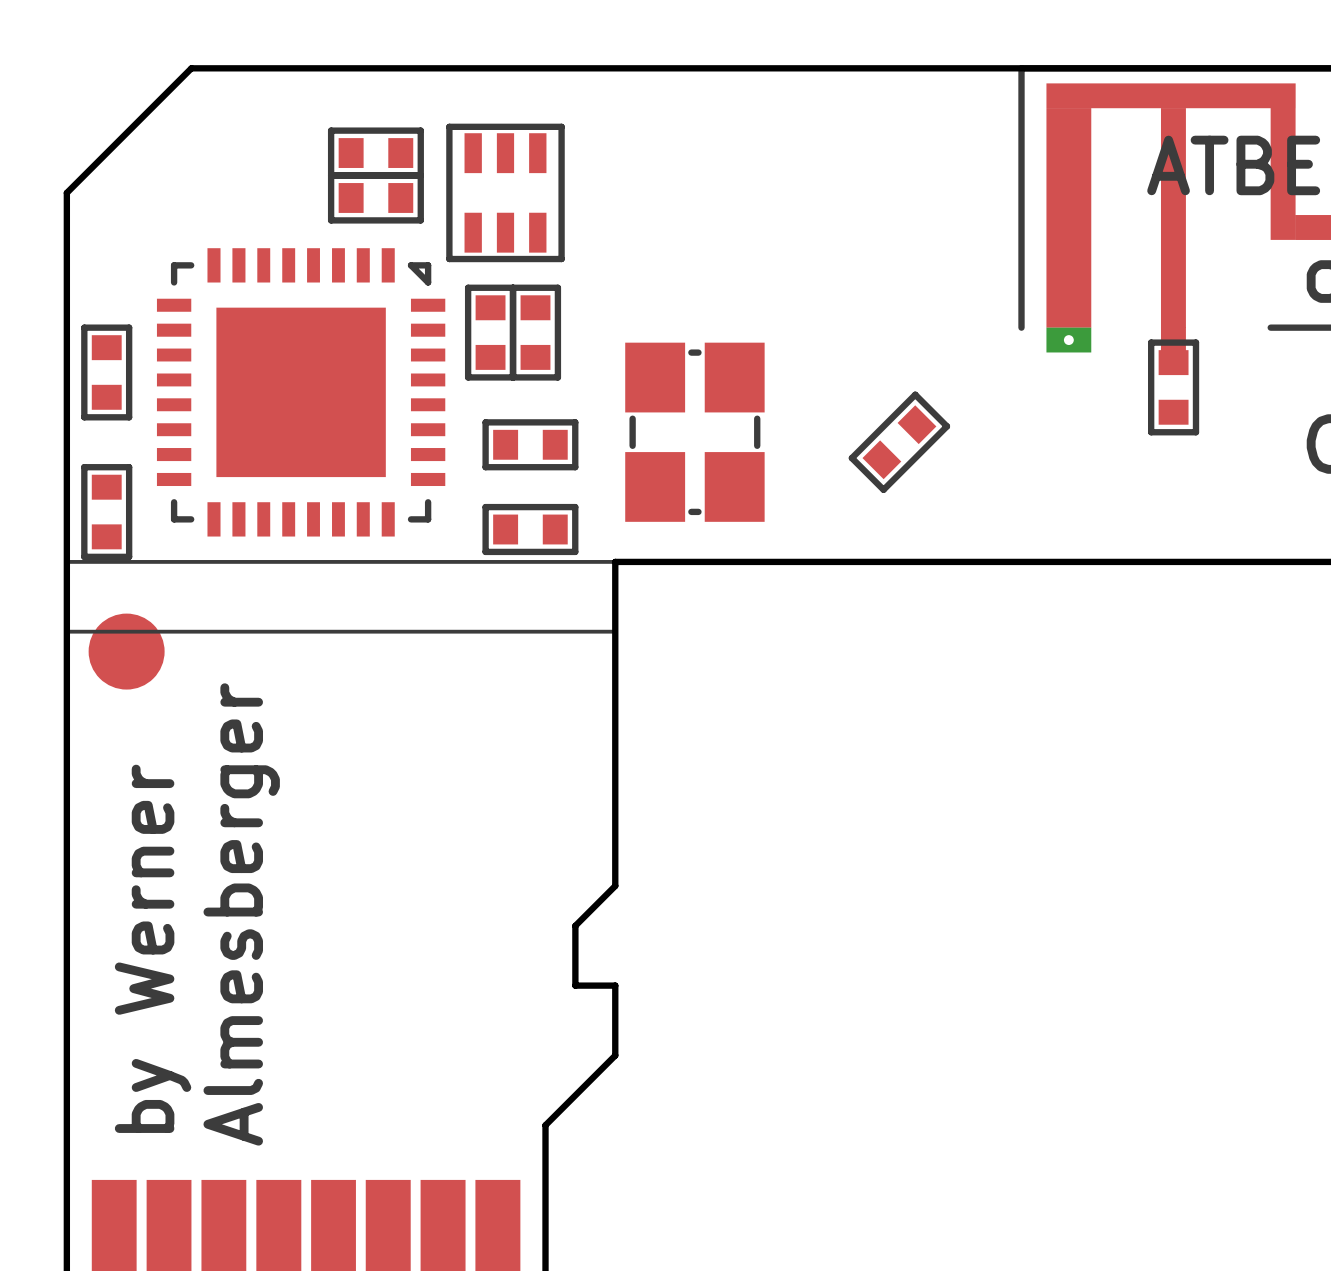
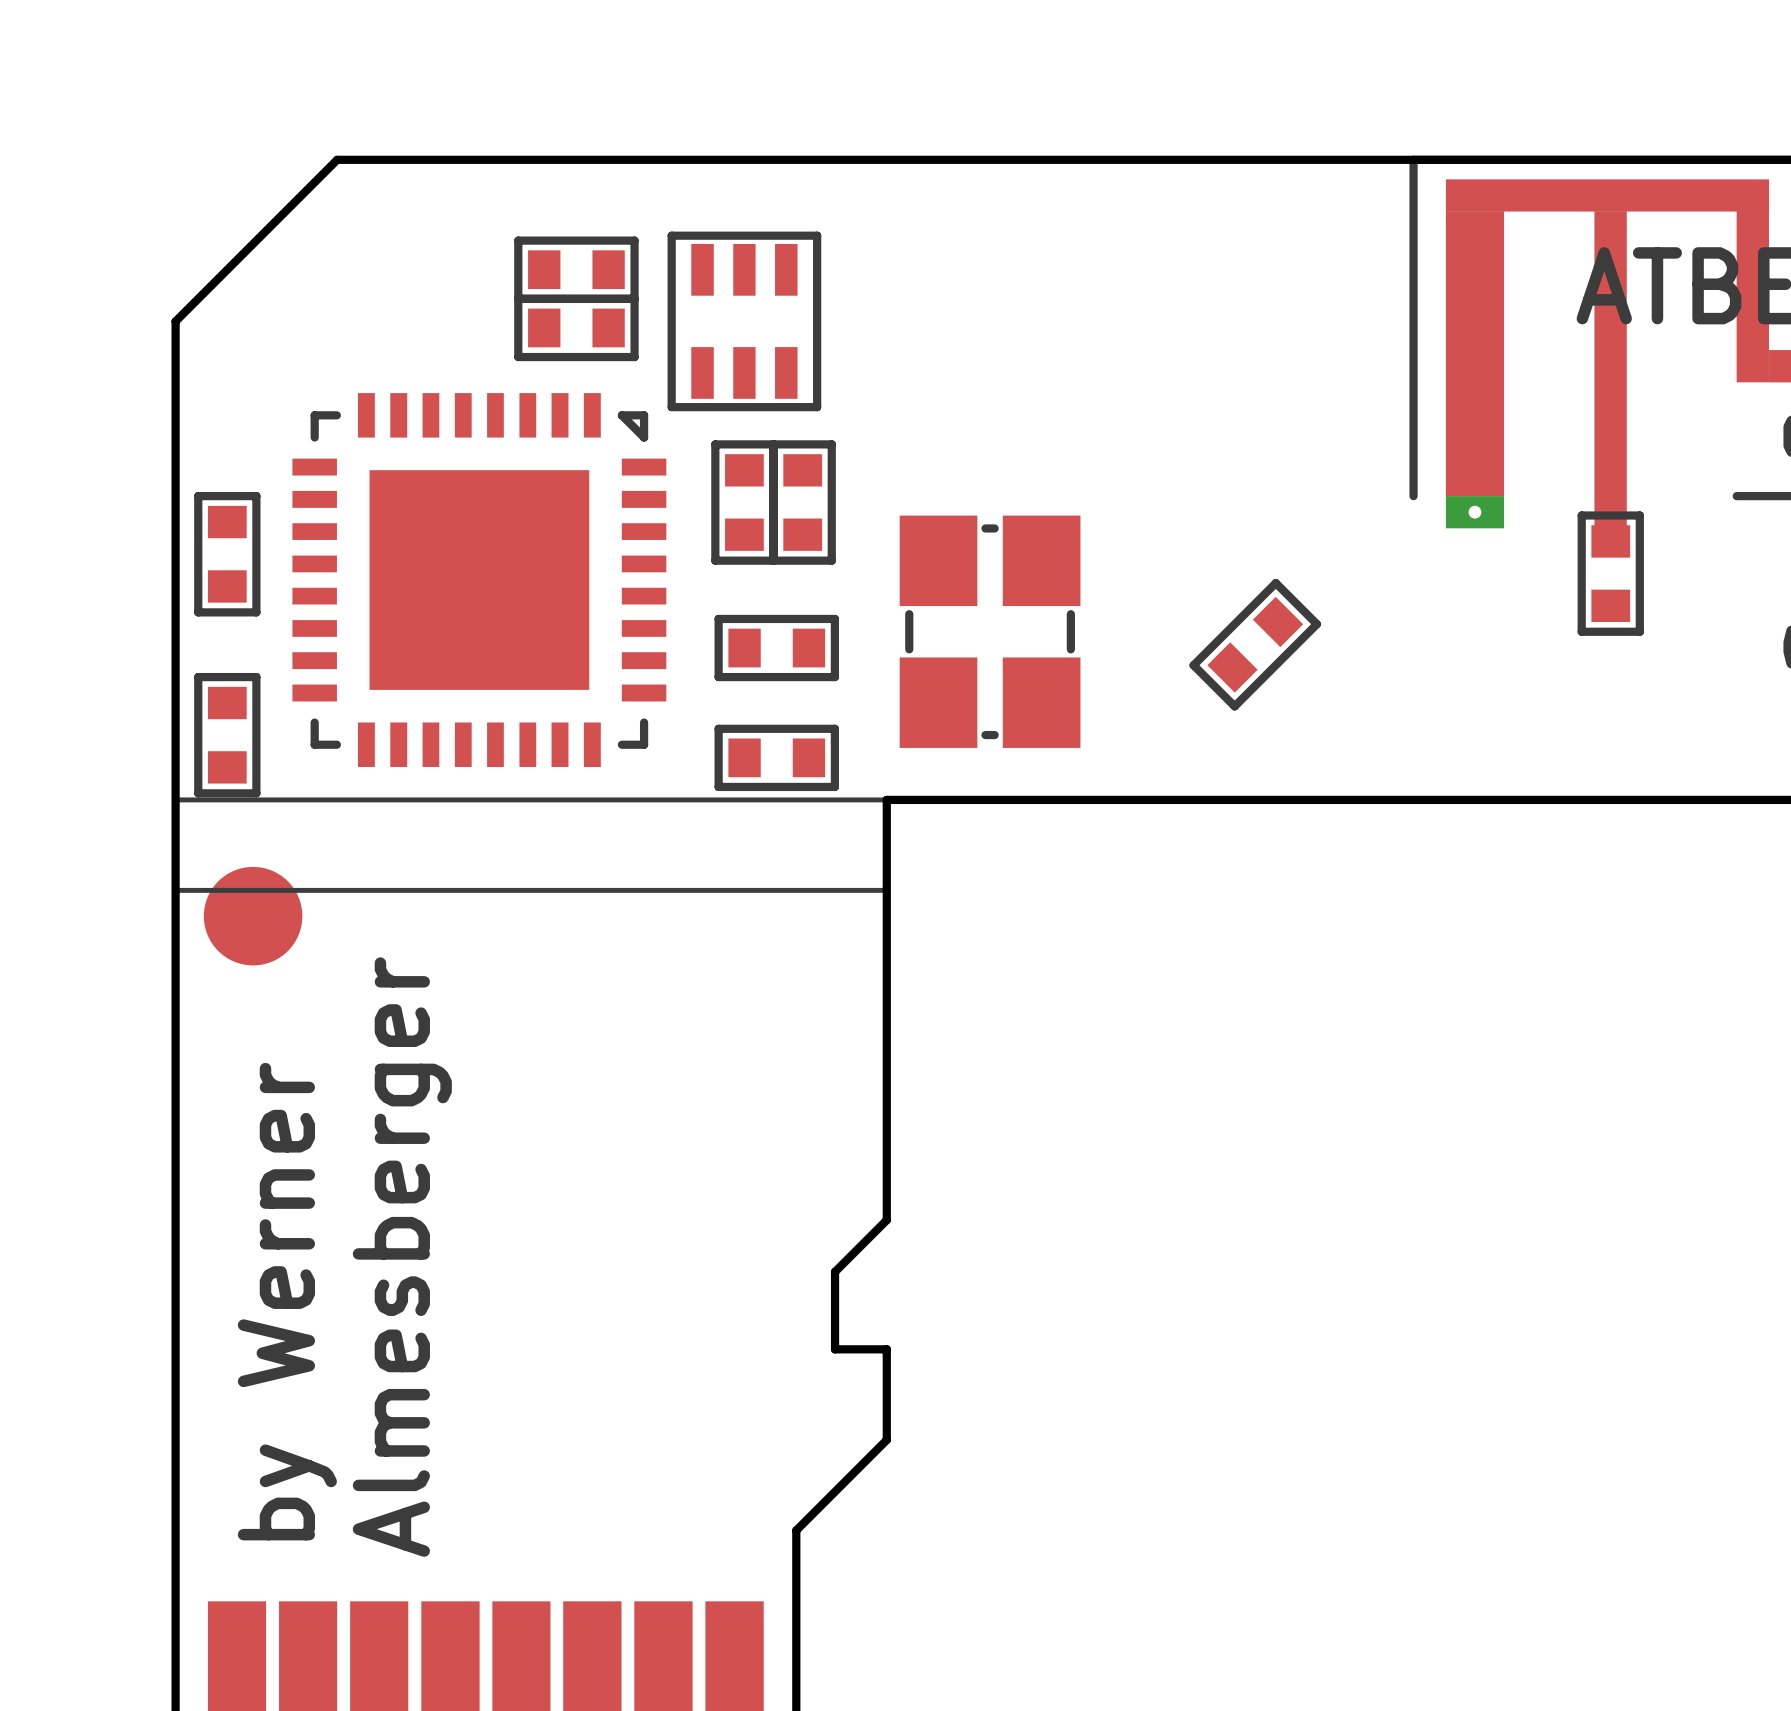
part position: (490, 332) -> (744, 502)
part position: (535, 332) -> (802, 502)

